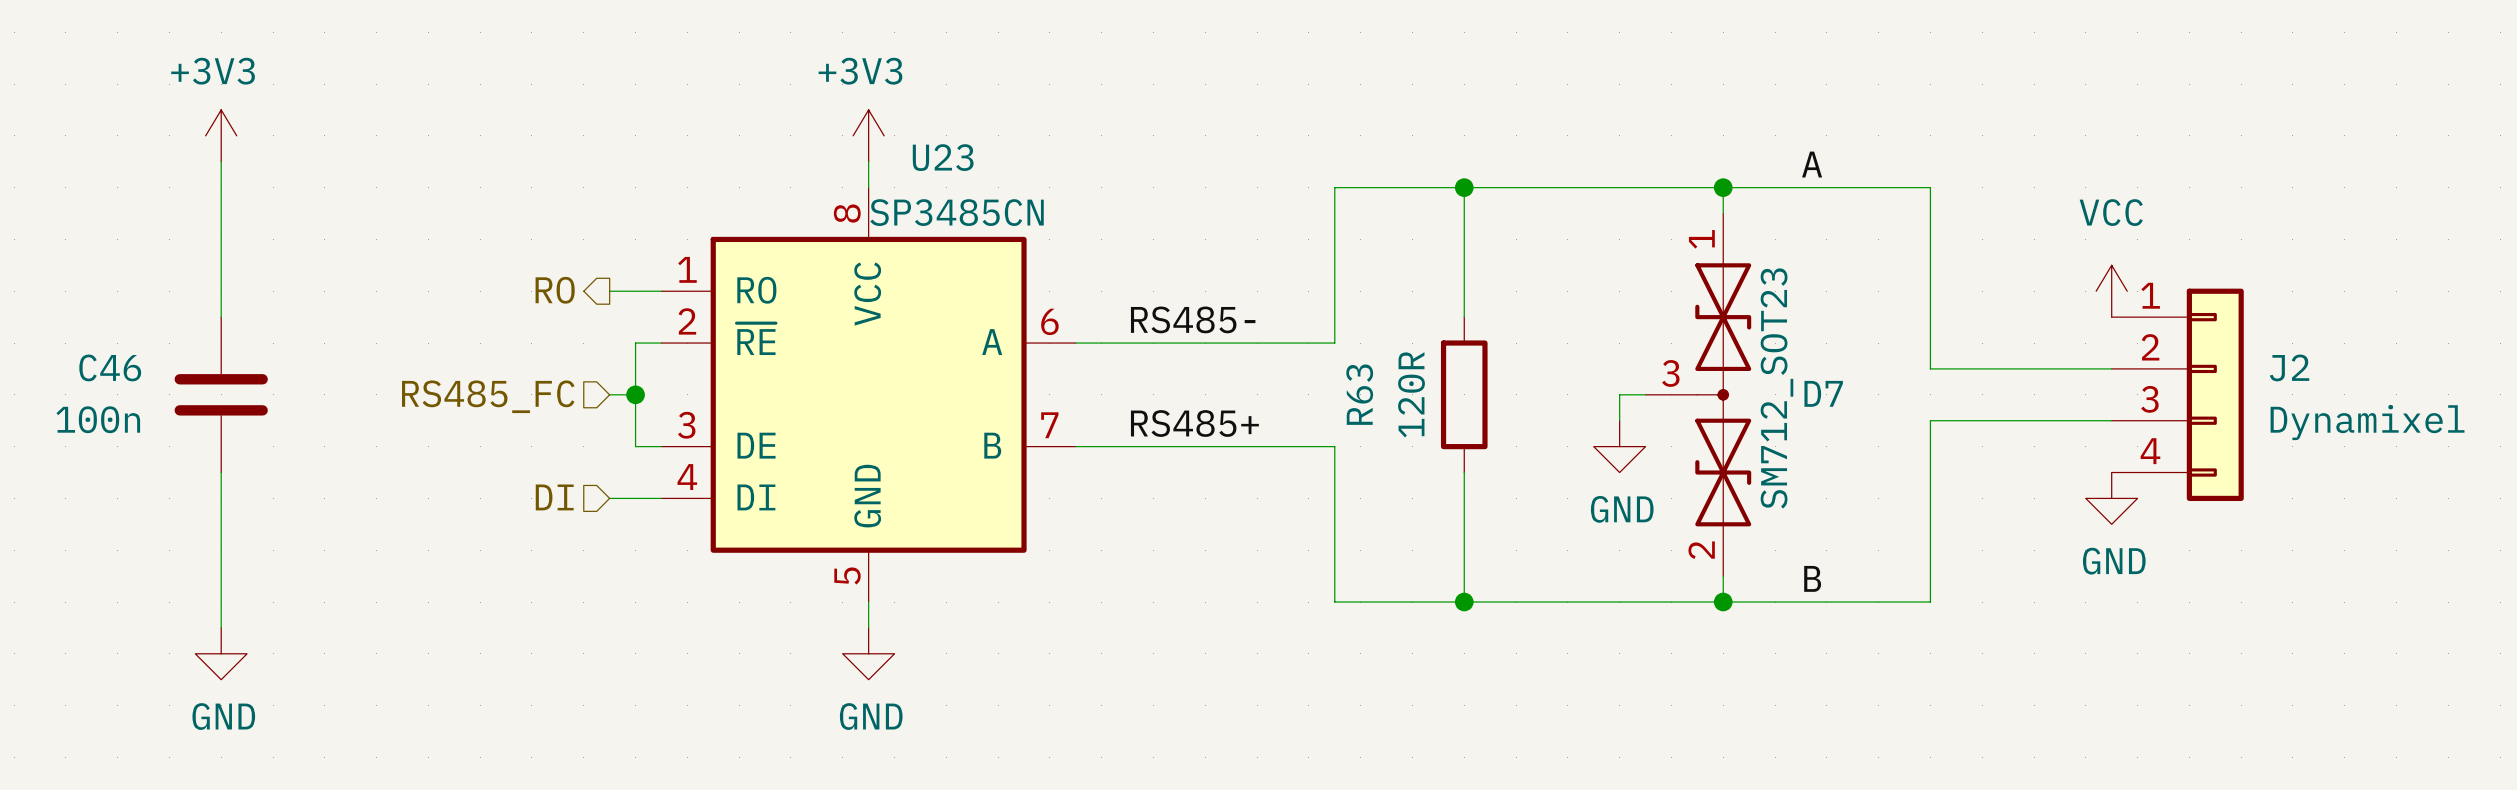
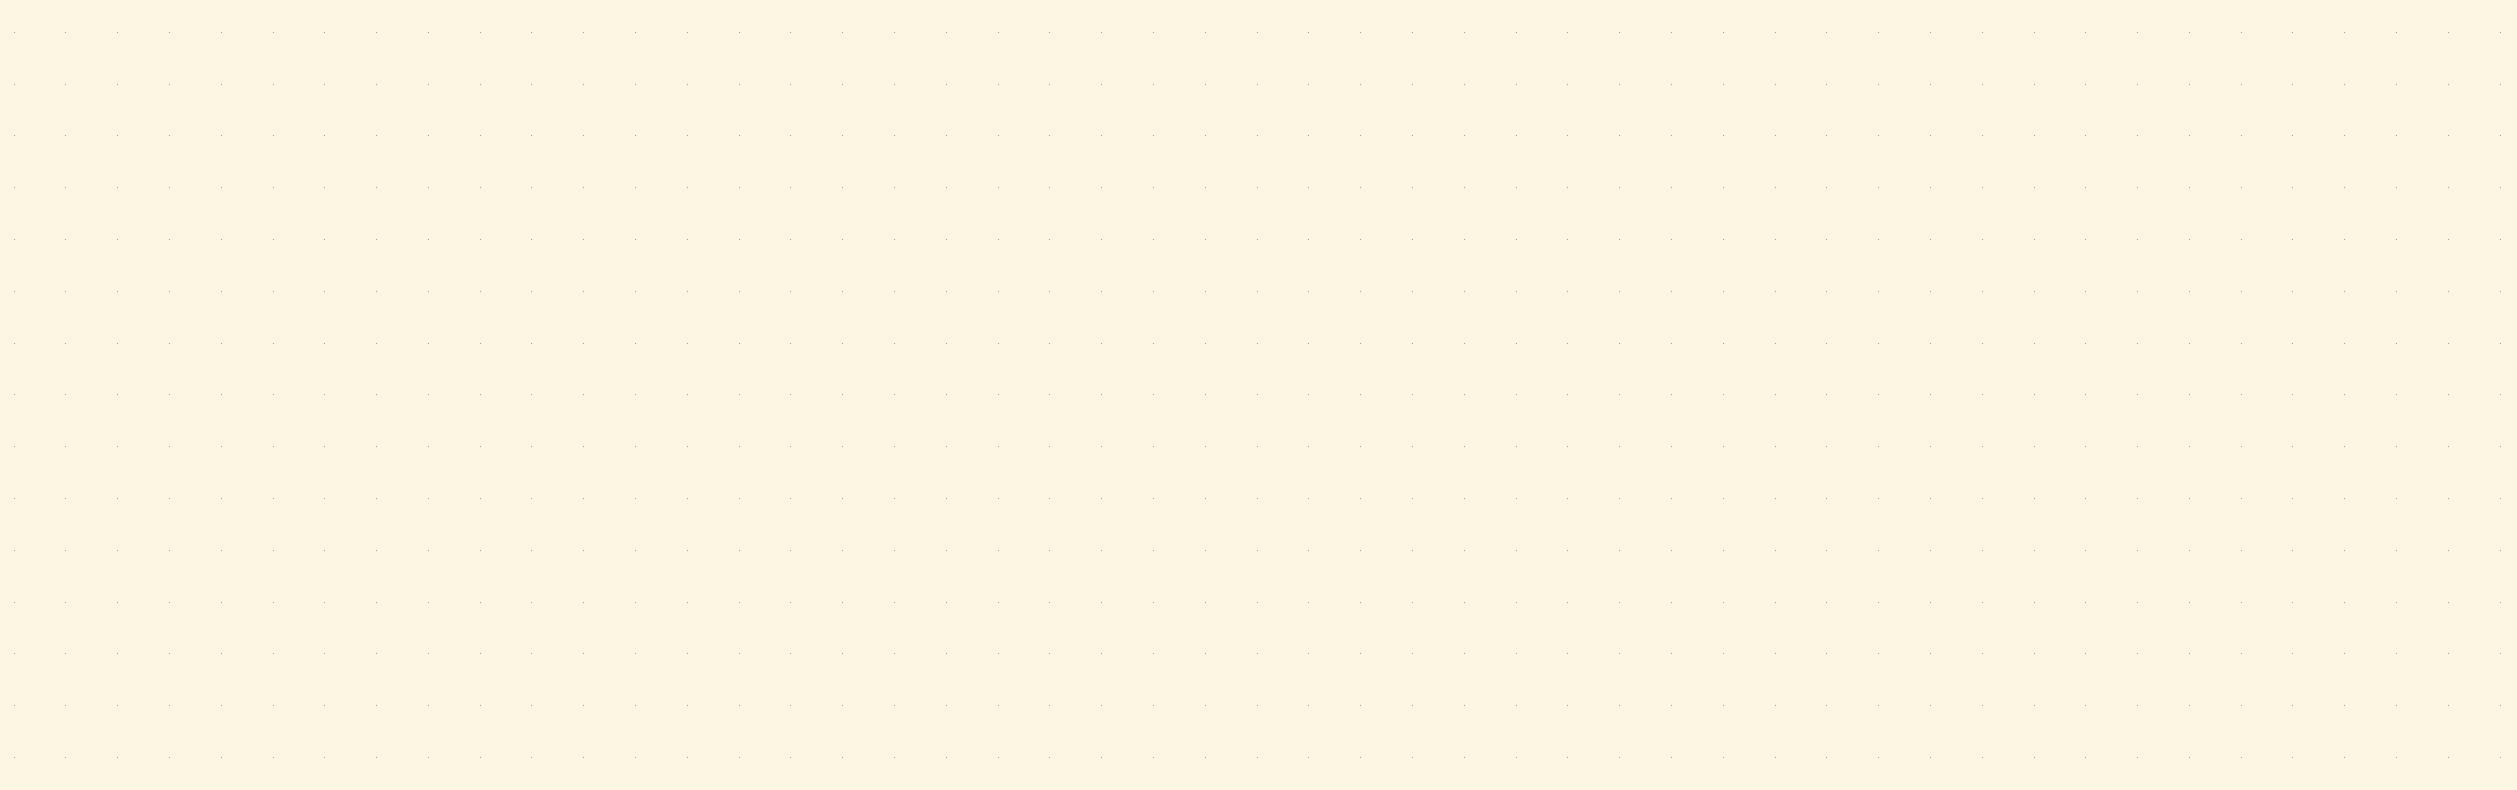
power symbol: +3V3 (221, 135) -> none
power symbol: +3V3 (868, 135) -> none
wire: (221, 161) (221, 317) -> none
wire: (868, 161) (868, 187) -> none
label: A (1812, 164) -> none
wire: (1464, 187) (1464, 317) -> none
junction: (1464, 187) -> none
wire: (1723, 187) (1723, 213) -> none
junction: (1723, 187) -> none
hierarchical label: RO (555, 290) -> none
wire: (609, 291) (661, 291) -> none
power symbol: VCC (2111, 291) -> none
label: RS485- (1193, 319) -> none
wire: (661, 343) (635, 343) (635, 446) (661, 446) -> none
wire: (1075, 343) (1334, 343) (1334, 187) (1930, 187) (1930, 368) (2111, 368) -> none
C46: 100n (221, 394) -> none
wire: (609, 394) (635, 394) -> none
junction: (635, 394) -> none
U23: SP3485CN (868, 394) -> none
R63: 120R (1464, 394) -> none
wire: (1645, 394) (1619, 394) (1619, 420) -> none
D7: SM712_SOT23 (1698, 394) -> none
J2: Dynamixel (2177, 394) -> none
hierarchical label: RS485_FC (488, 396) -> none
wire: (2111, 420) (1930, 420) (1930, 602) (1334, 602) (1334, 446) (1075, 446) -> none
label: RS485+ (1194, 423) -> none
power symbol: GND (1619, 446) -> none
wire: (221, 472) (221, 627) -> none
wire: (1464, 472) (1464, 602) -> none
hierarchical label: DI (554, 497) -> none
wire: (609, 498) (661, 498) -> none
power symbol: GND (2111, 498) -> none
wire: (1723, 576) (1723, 602) -> none
label: B (1812, 578) -> none
wire: (868, 602) (868, 627) -> none
junction: (1464, 602) -> none
junction: (1723, 602) -> none
power symbol: GND (221, 653) -> none
power symbol: GND (868, 653) -> none

